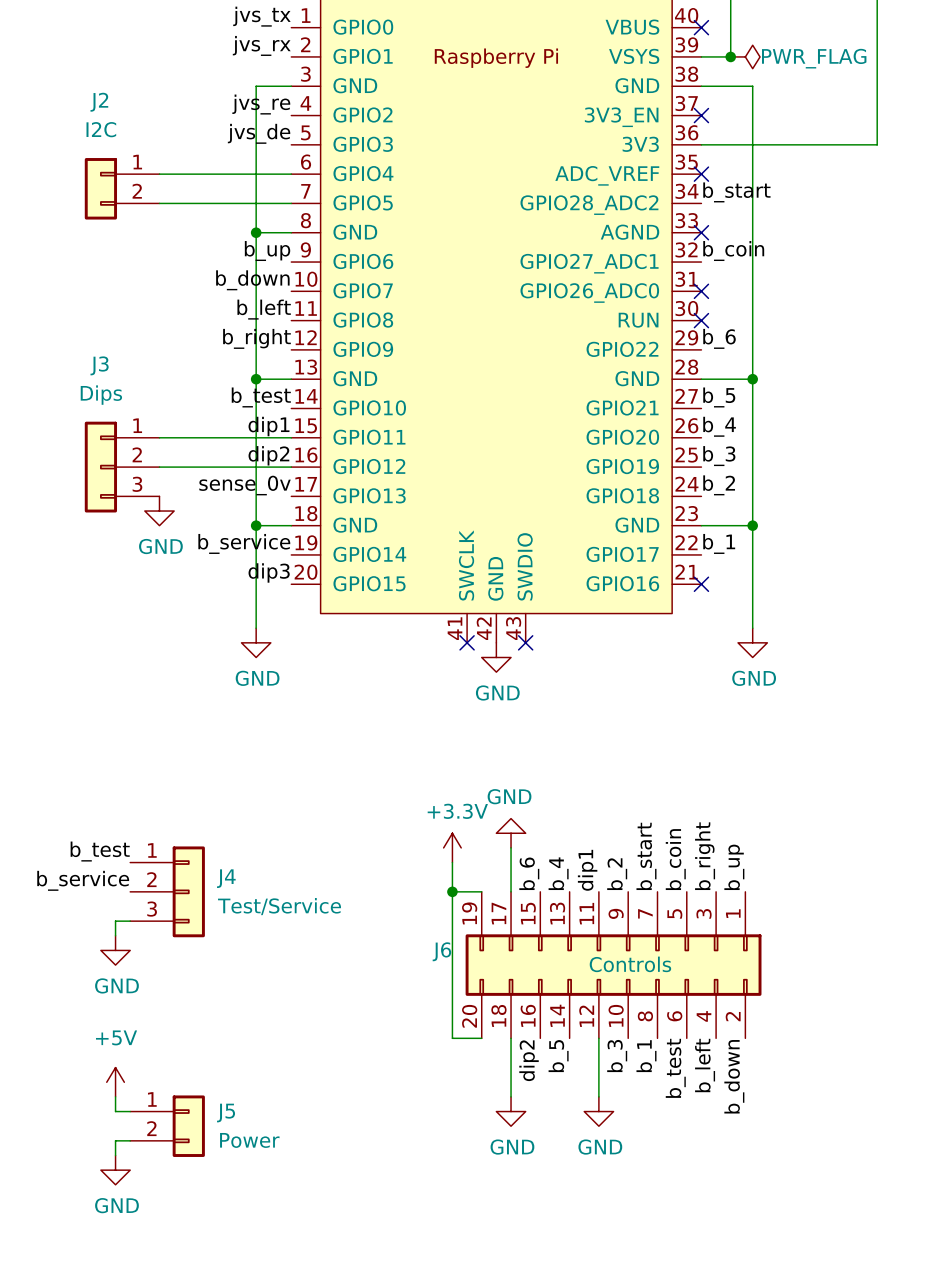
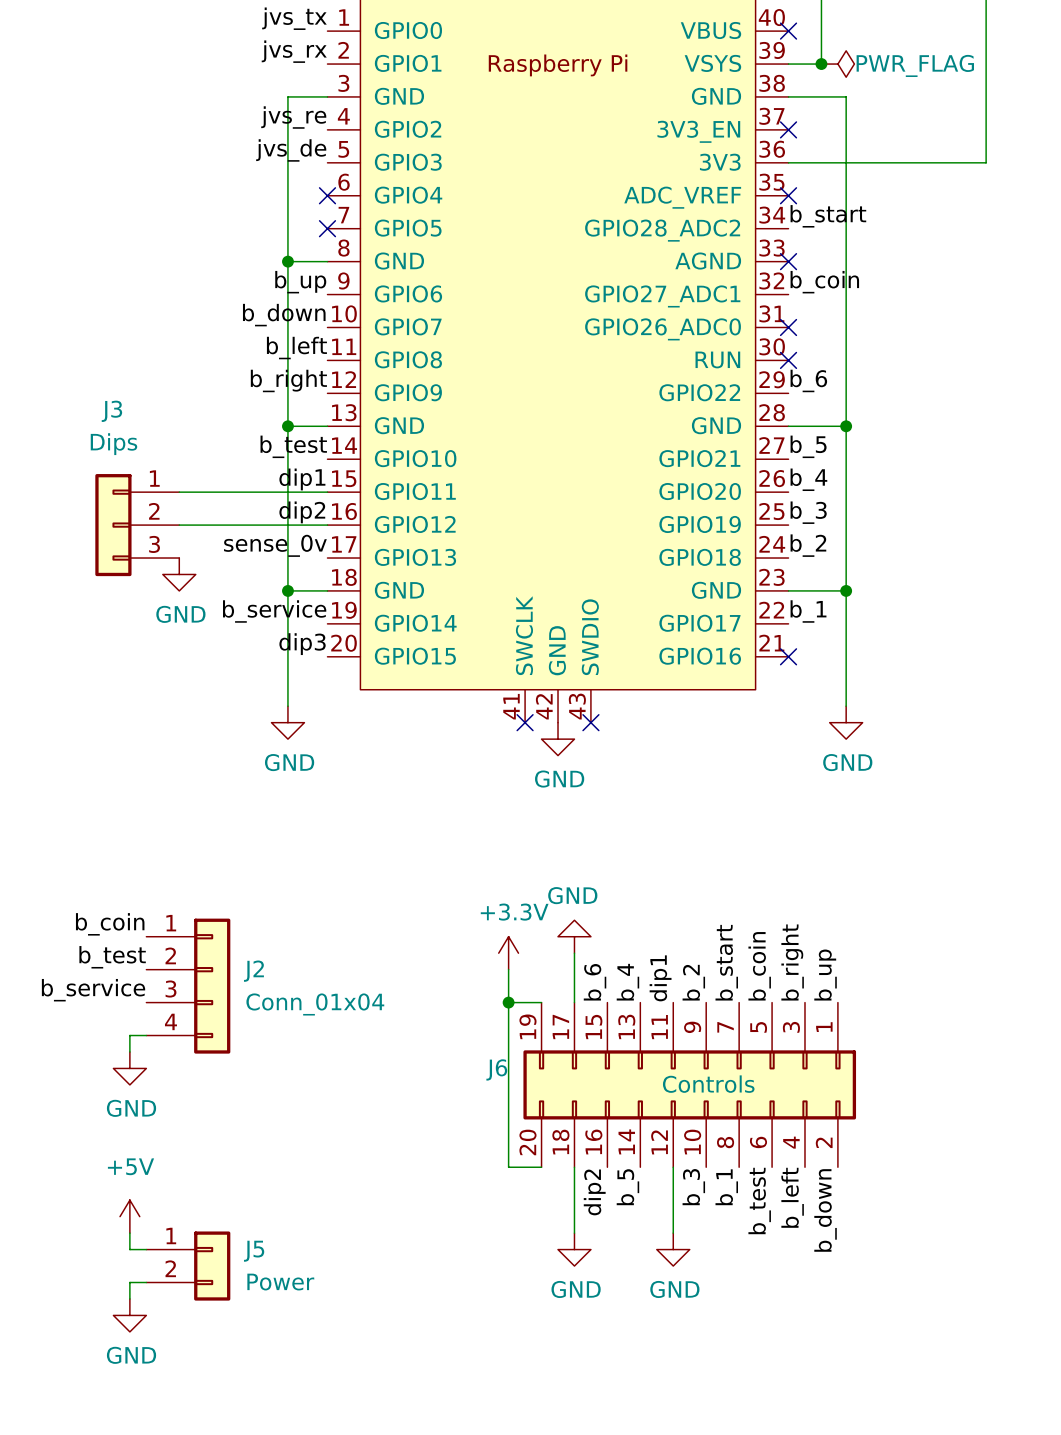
J2 name position: J2 (99, 102) -> J2 (253, 971)
J2 value: I2C (101, 129) -> Conn_01x04 (315, 1004)
J2 symbol: [84, 158, 160, 220] -> [146, 918, 231, 1054]
wire: (159, 174) (291, 174) -> none
no-connect mark: none -> (327, 195)
wire: (159, 203) (291, 203) -> none
no-connect mark: none -> (327, 228)
label: none -> b_coin (110, 924)
J4: Test/Service (167, 891) -> none

